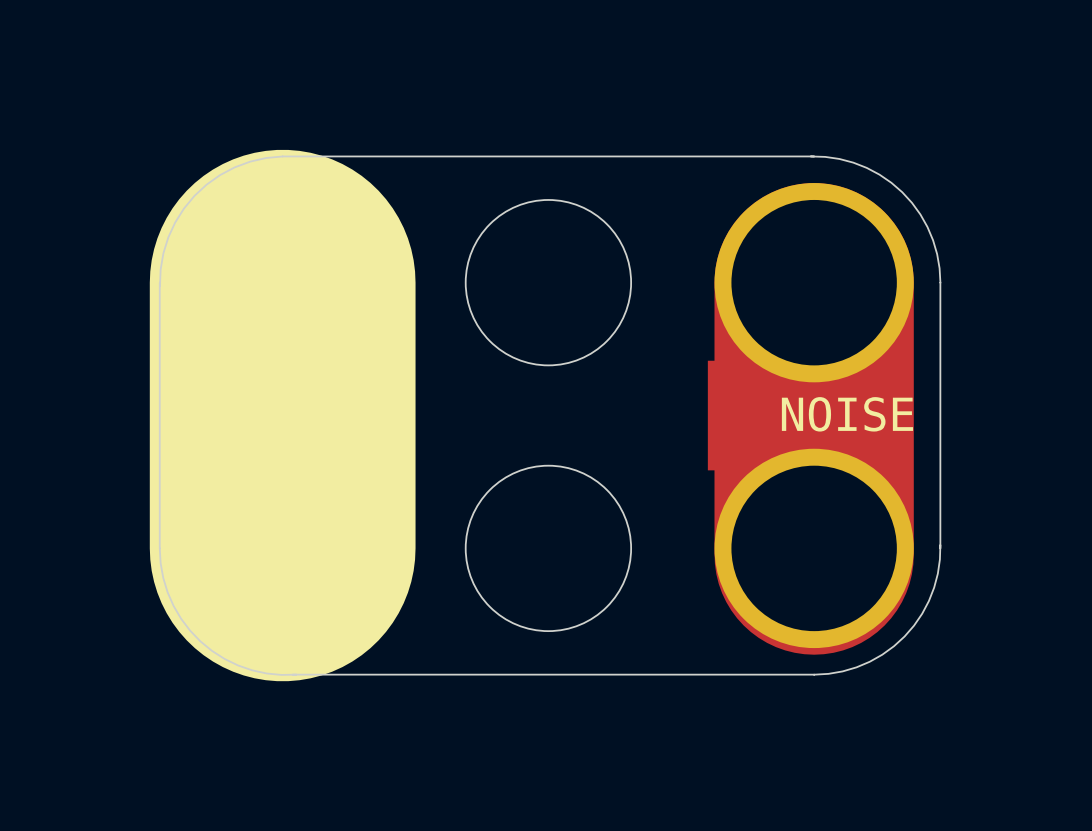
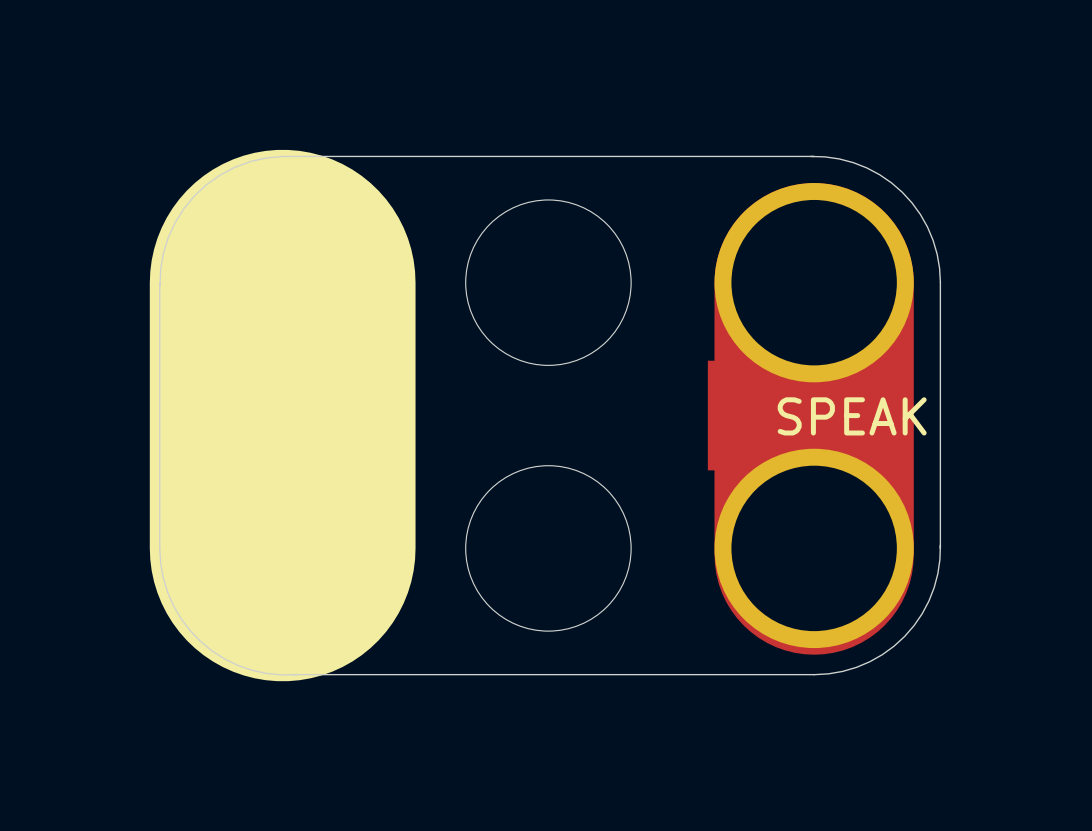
part footprint: [149, 149, 942, 682] -> [149, 149, 942, 682]

